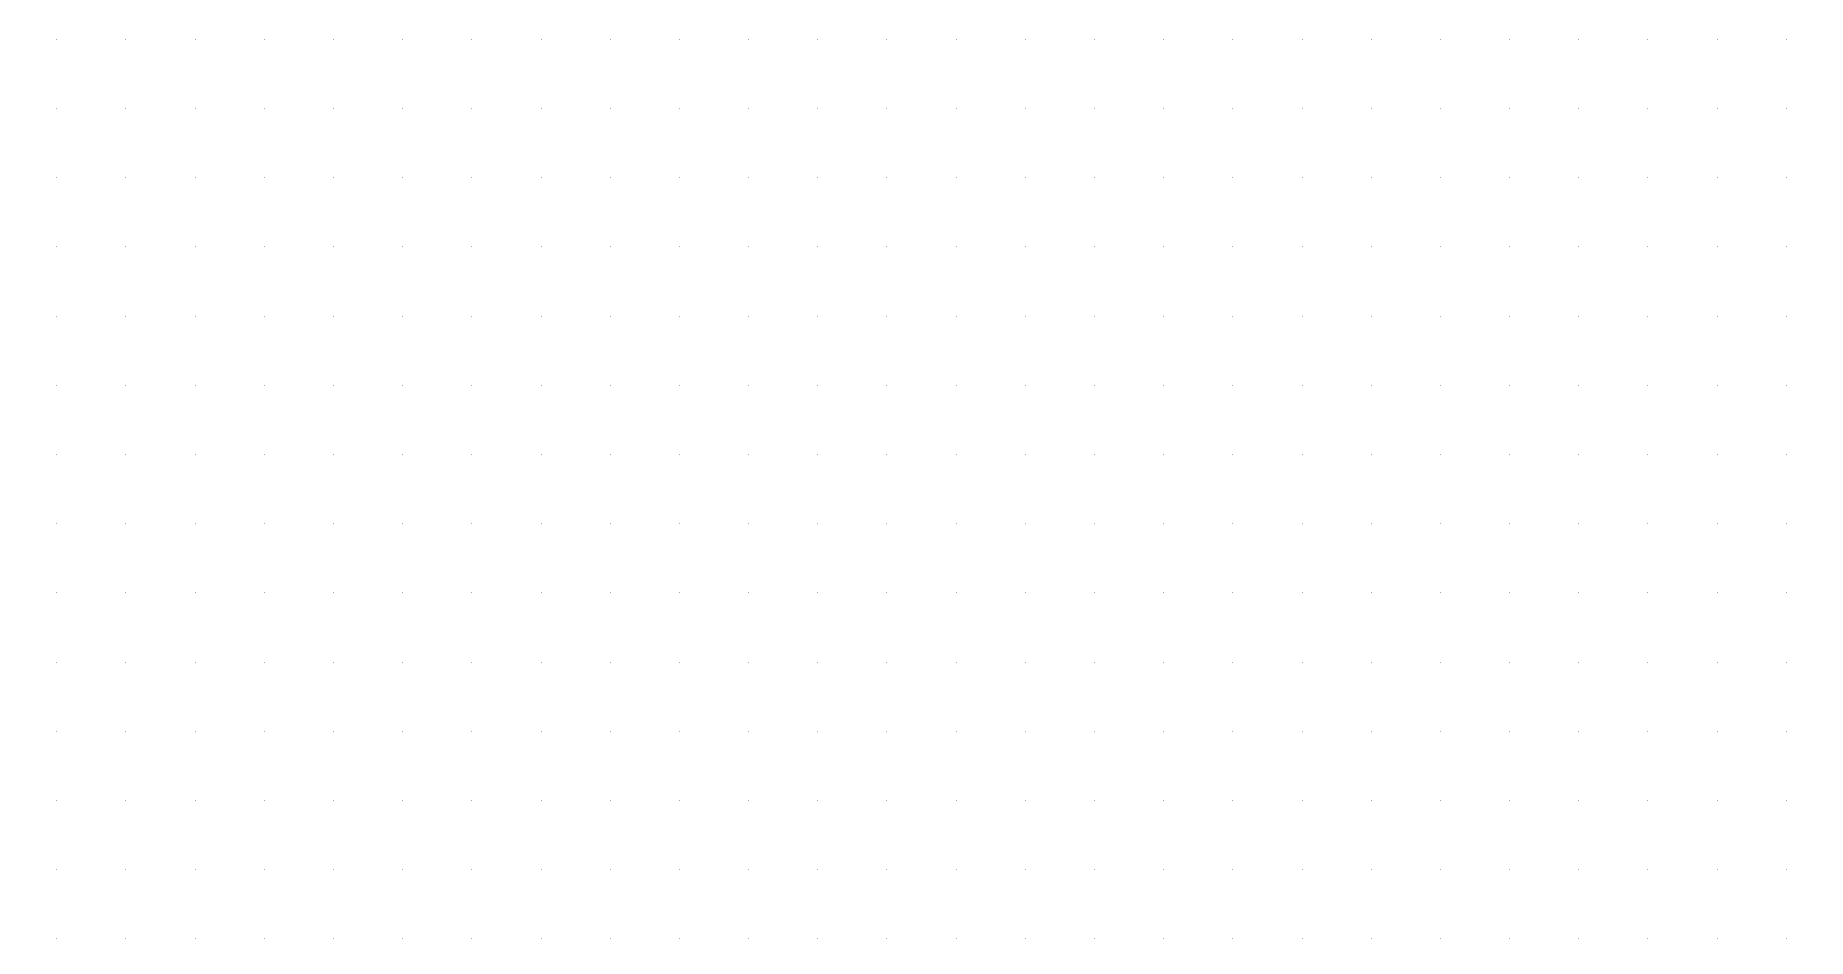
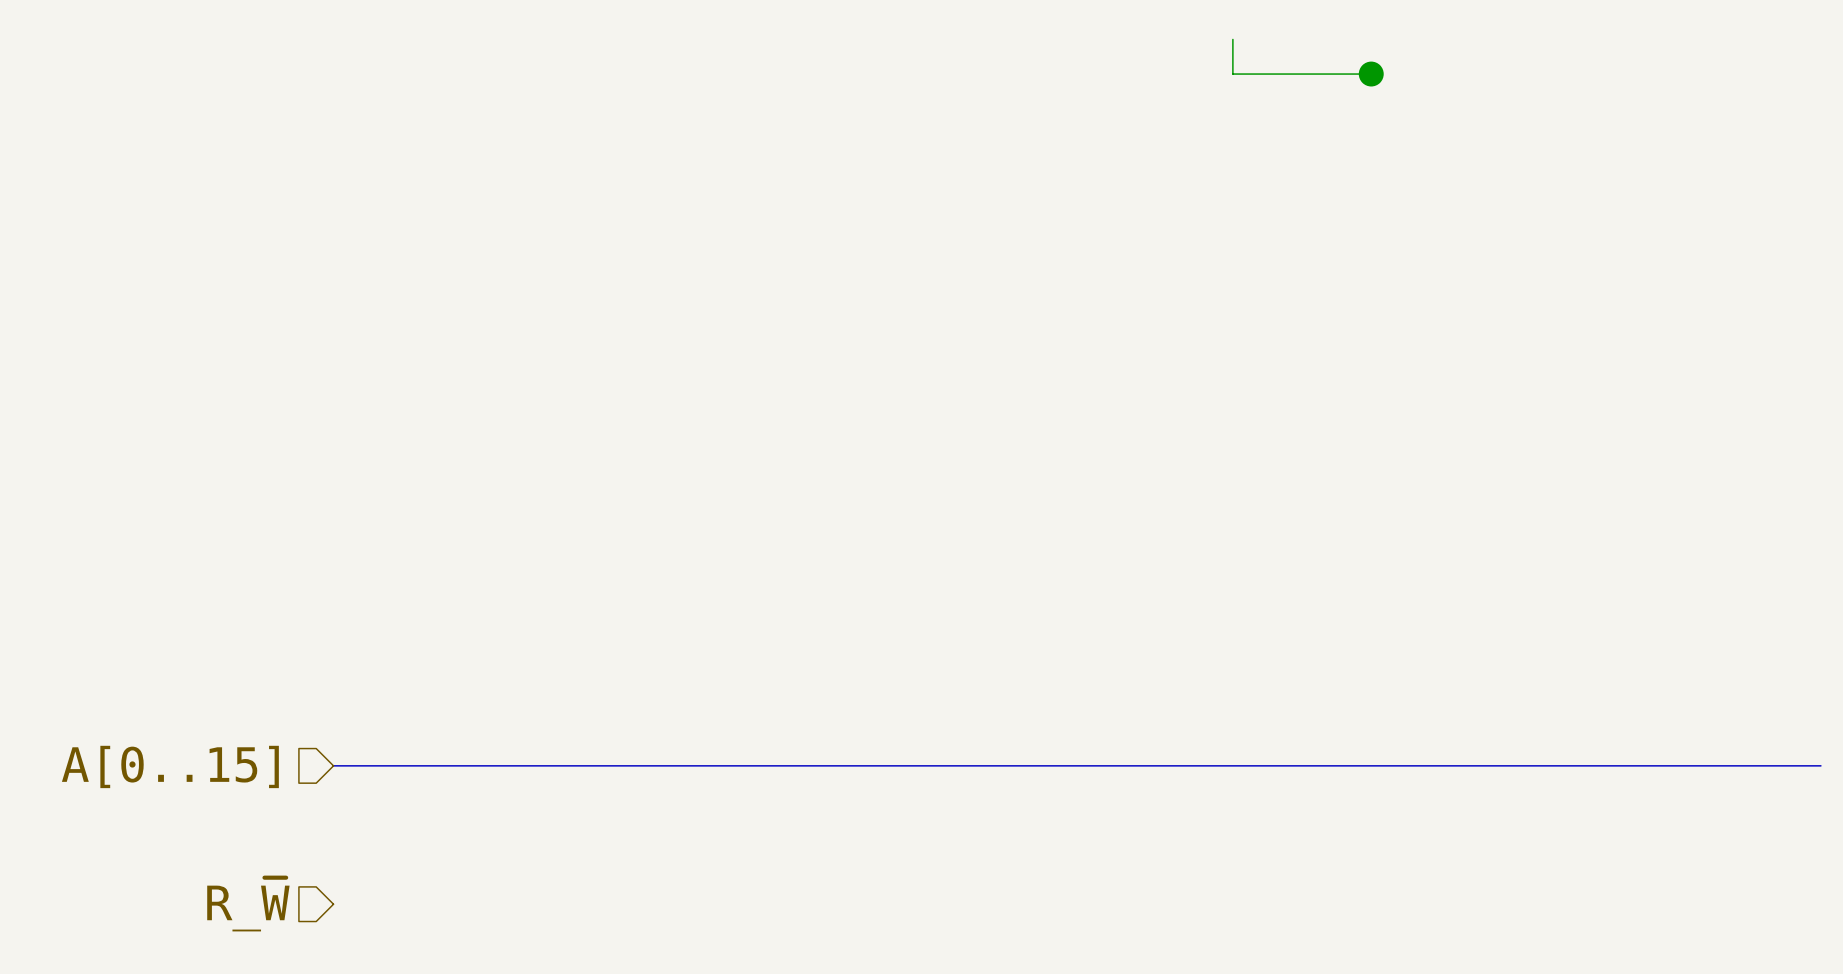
wire: none -> (1232, 39) (1232, 74) (1371, 74)
junction: none -> (1371, 74)
bus: none -> (333, 765) (1820, 765)
hierarchical label: none -> A[0..15] (170, 766)
hierarchical label: none -> R_~{W} (248, 904)

